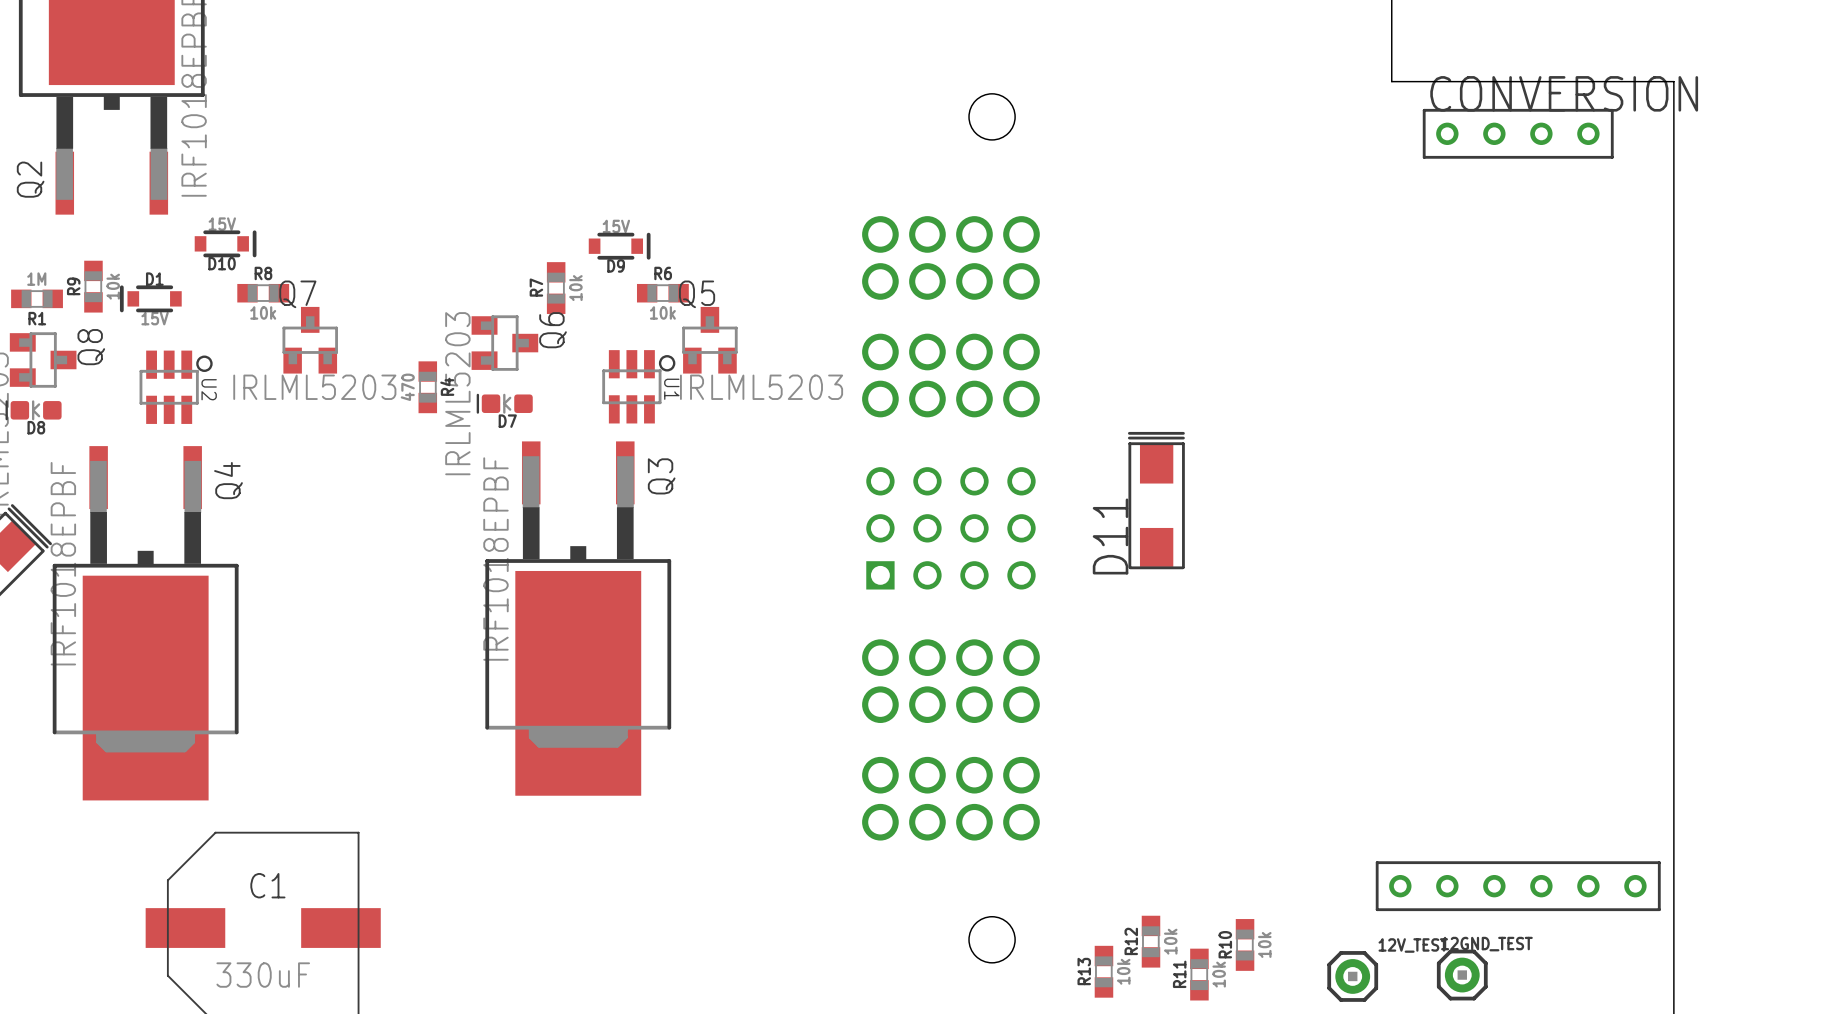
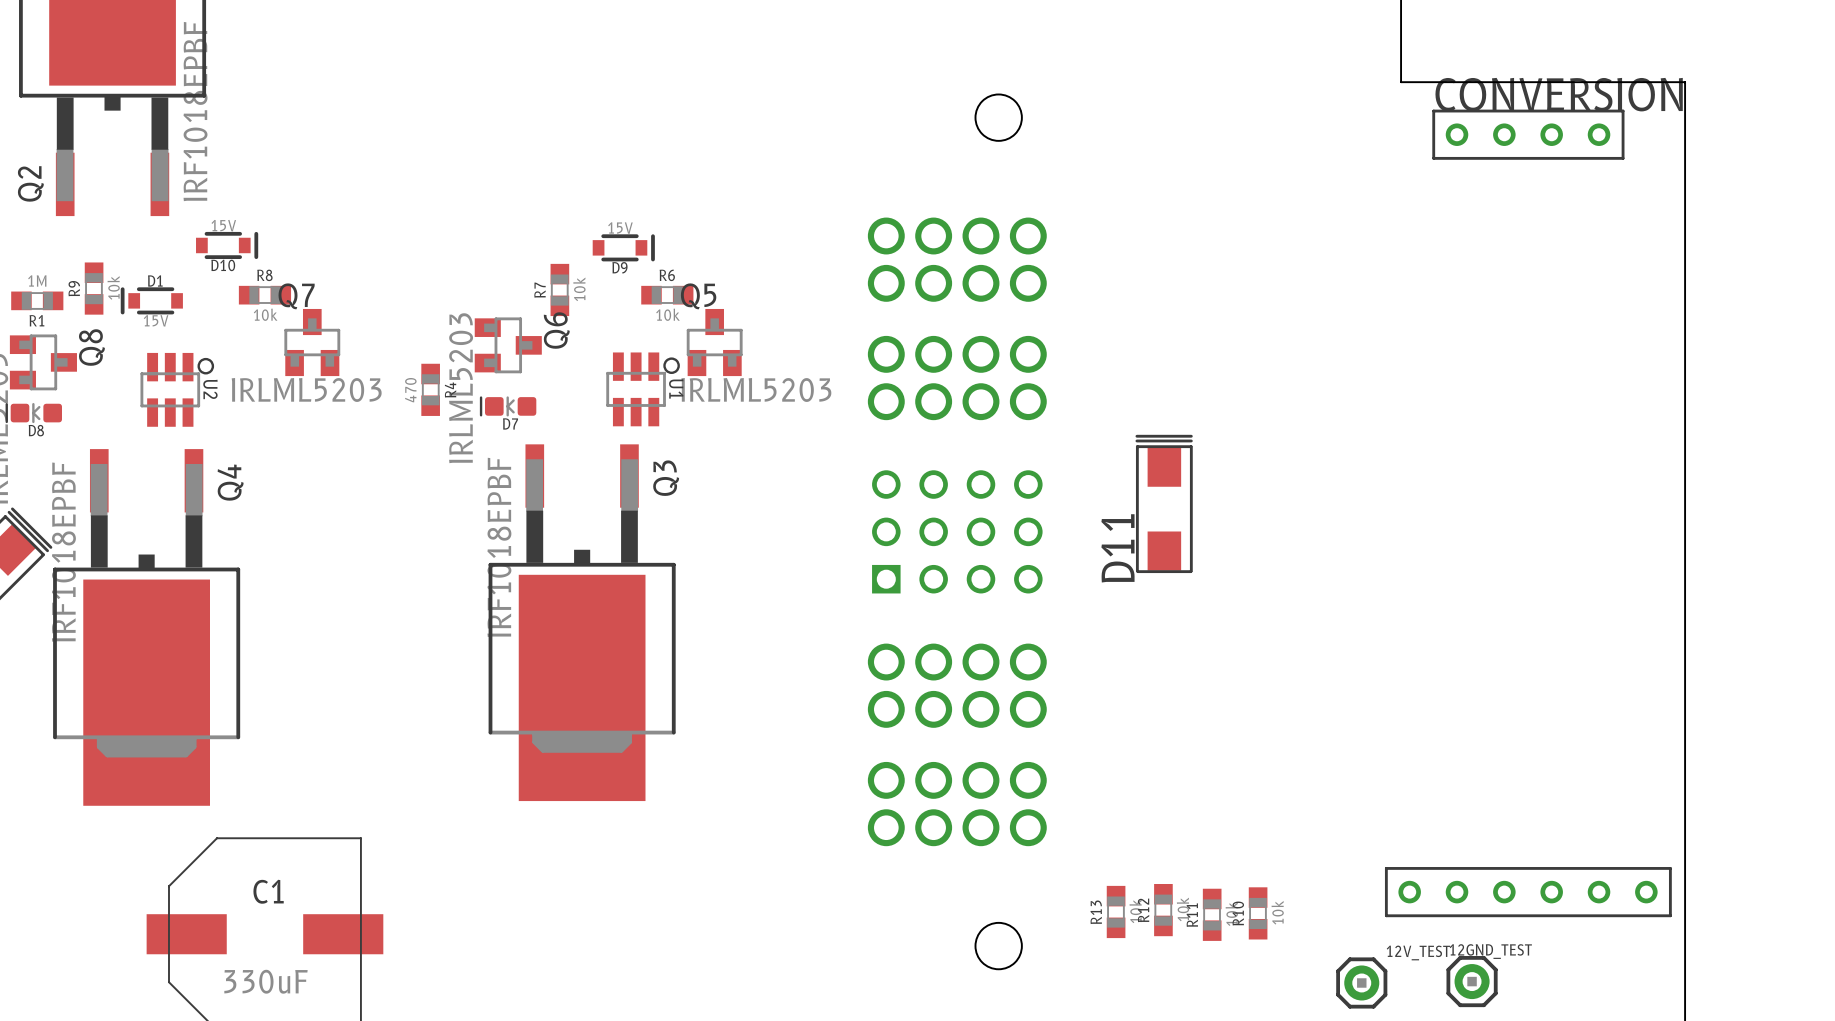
R12 position: (1150, 941) -> (1163, 910)
R10 position: (1245, 944) -> (1258, 913)
R13 position: (1103, 971) -> (1116, 911)
R11 position: (1199, 974) -> (1212, 914)

